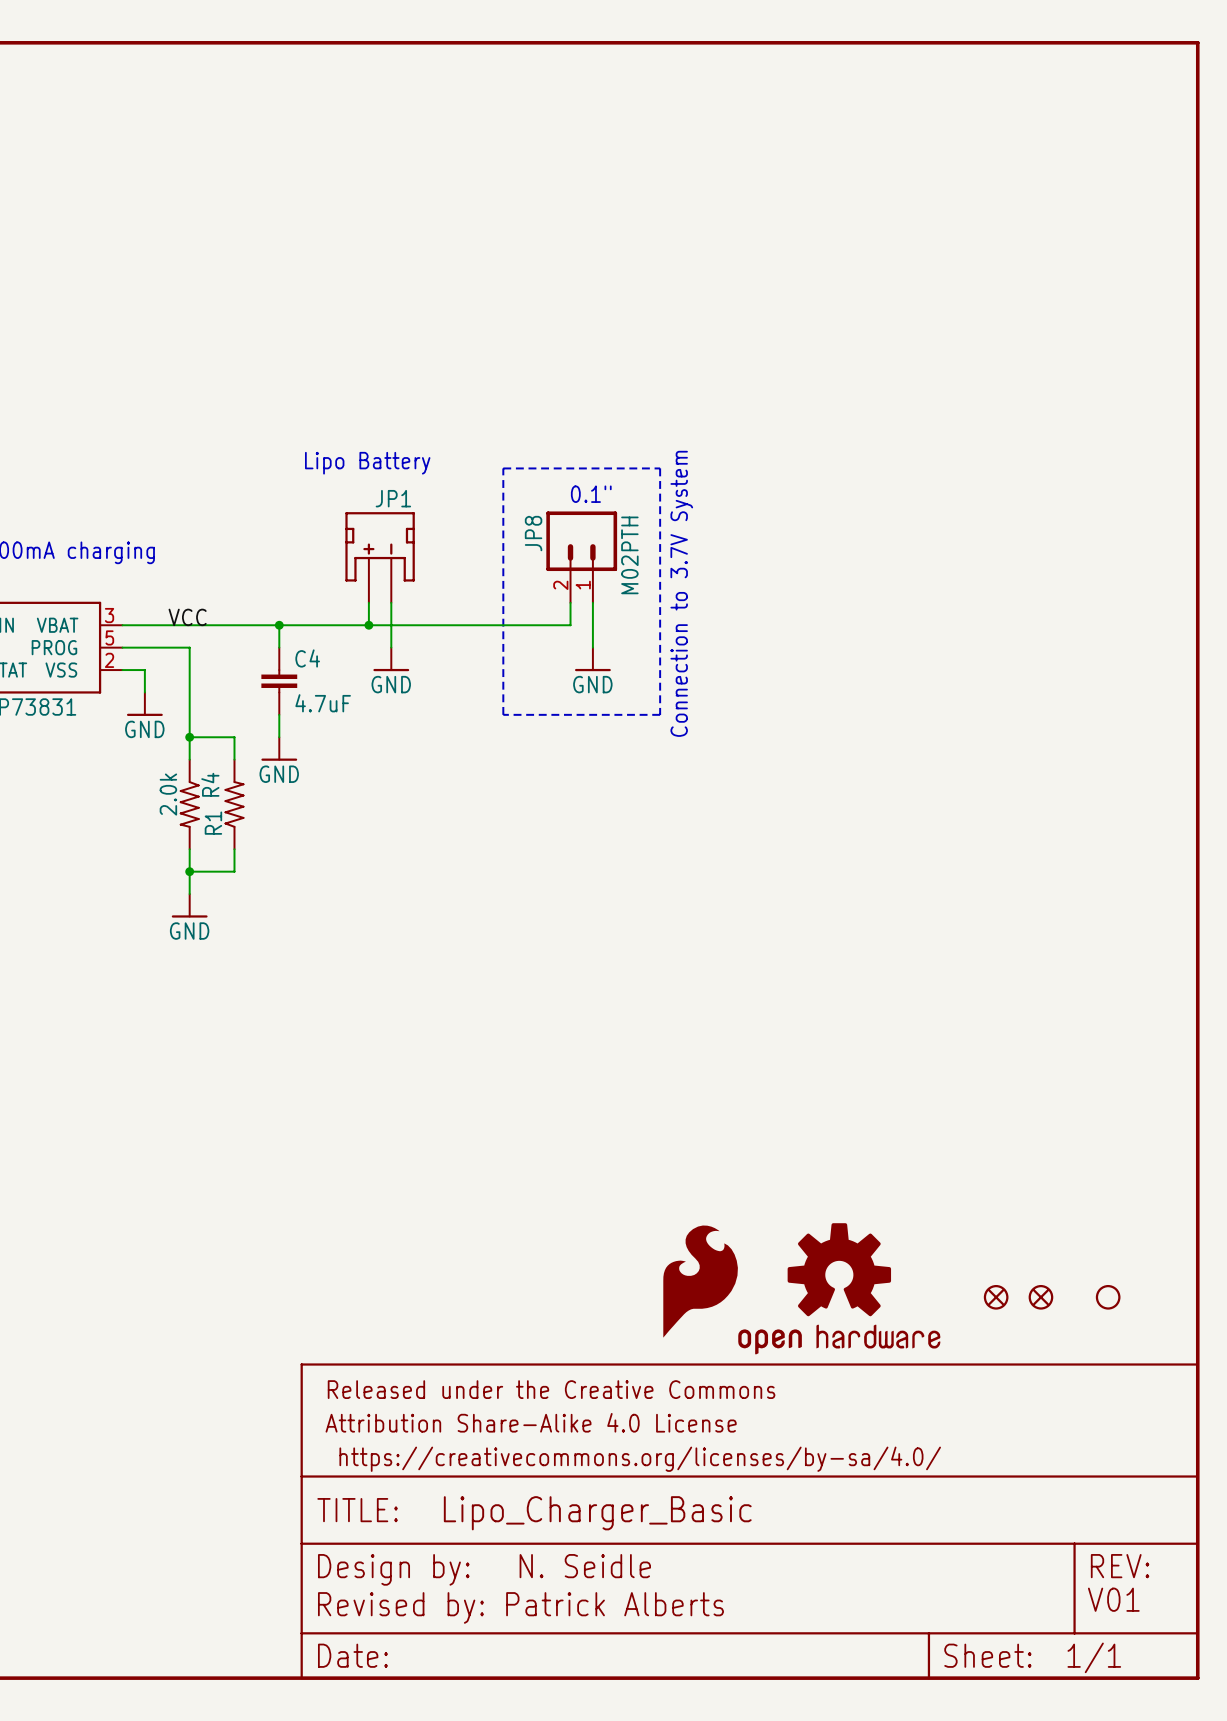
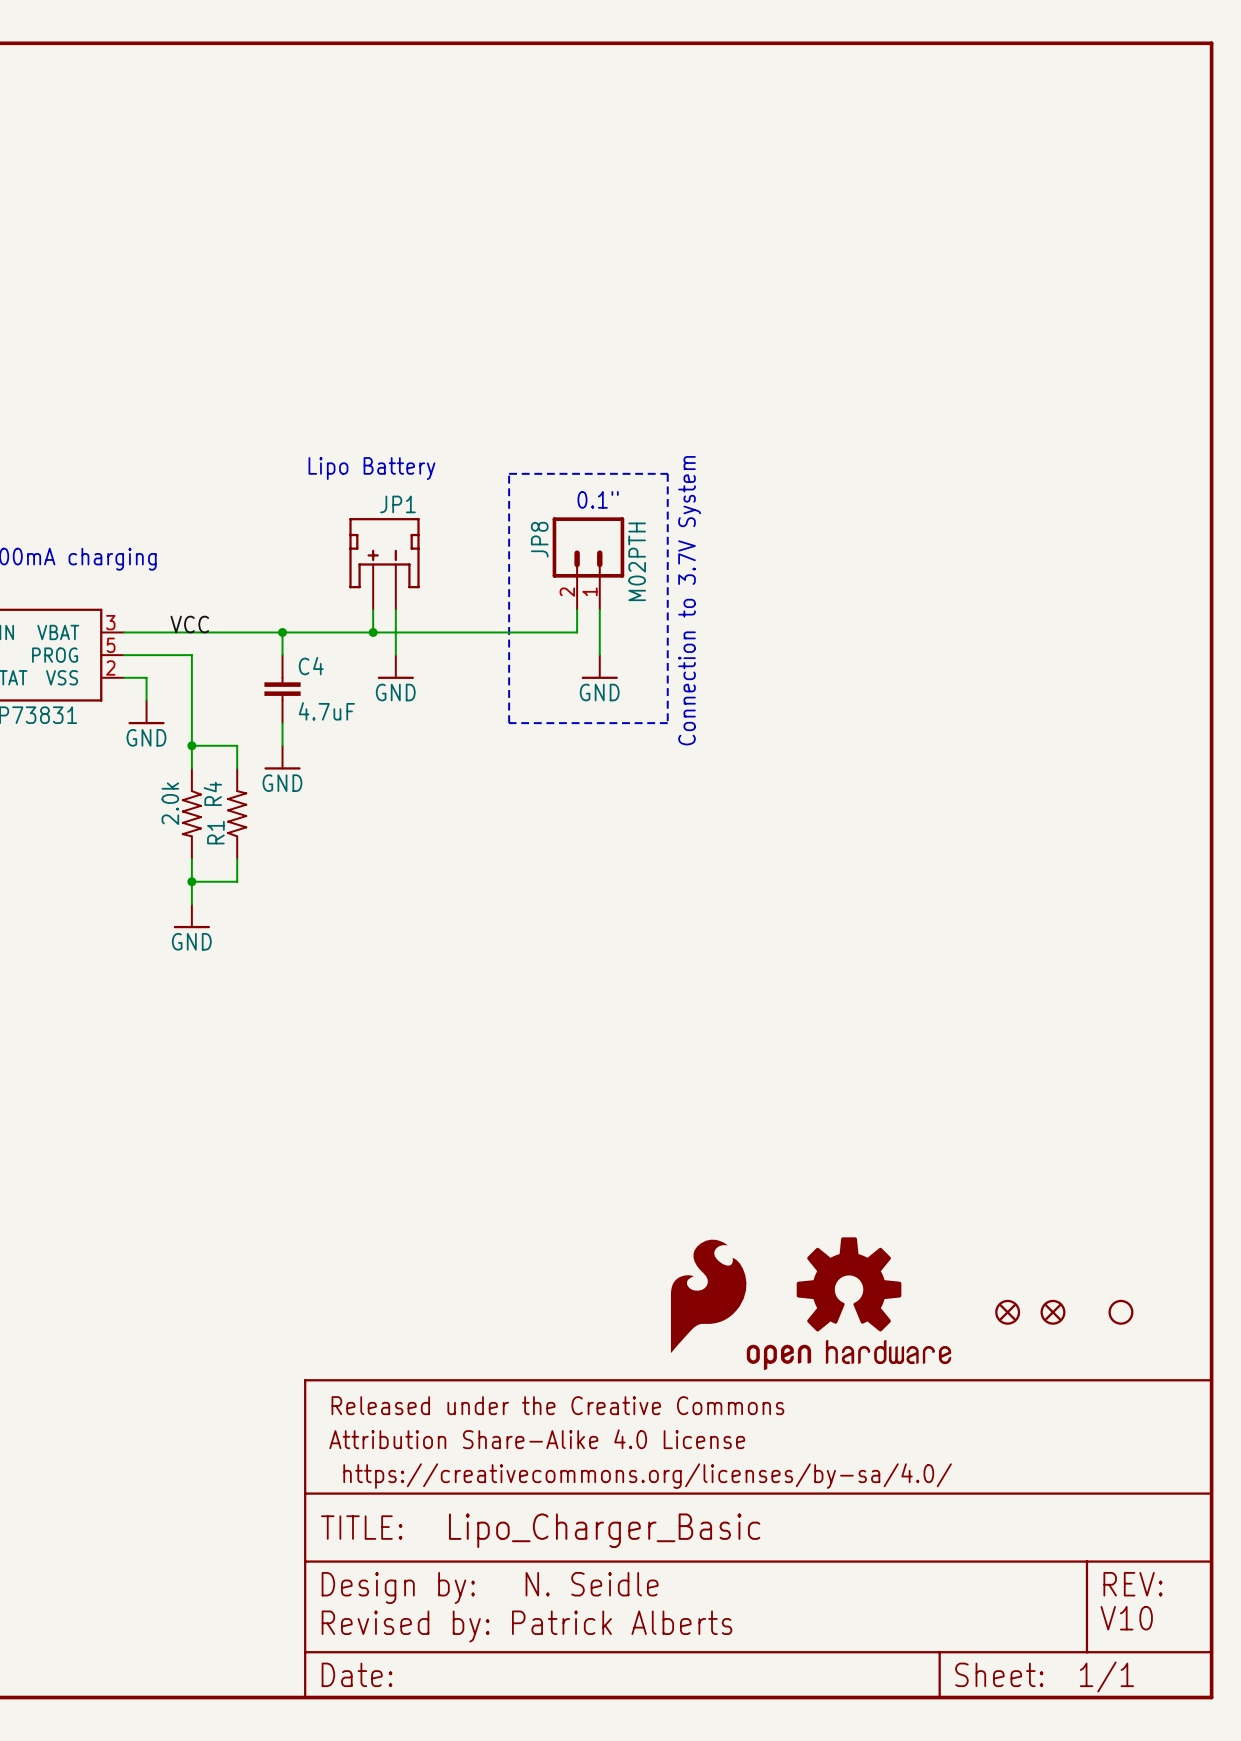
text: V01 (1113, 1599) -> V10 (1126, 1618)

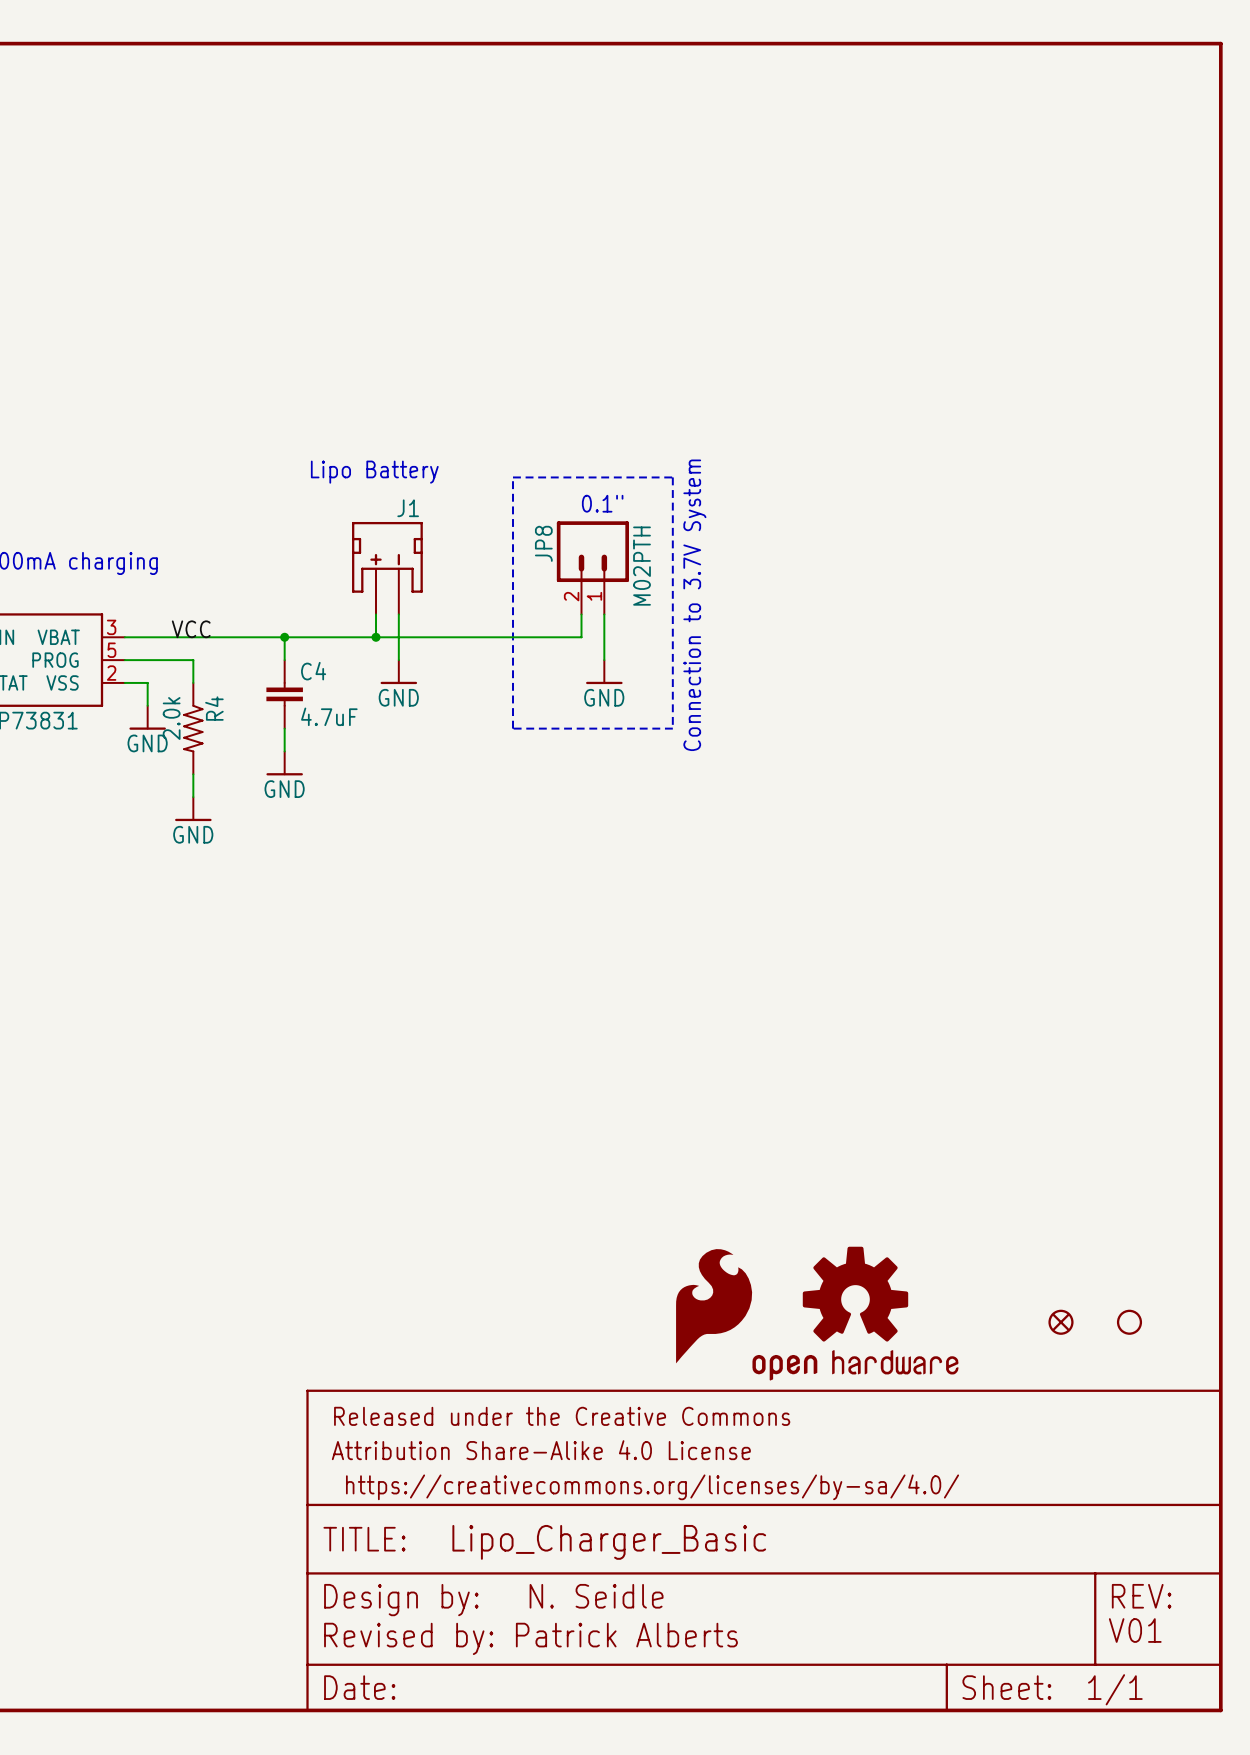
JP1 name: JP1 (397, 504) -> J1 (408, 508)
wire: (191, 745) (237, 745) (237, 768) -> none
junction: (191, 745) -> none
R4 position: (191, 813) -> (193, 728)
R1: (237, 813) -> none
wire: (191, 859) (191, 904) -> none
wire: (237, 859) (237, 881) (191, 881) -> none
junction: (191, 881) -> none
power symbol position: GND (191, 916) -> GND (193, 809)
part: (1007, 1312) -> none
text: V10 (1126, 1618) -> V01 (1135, 1630)

